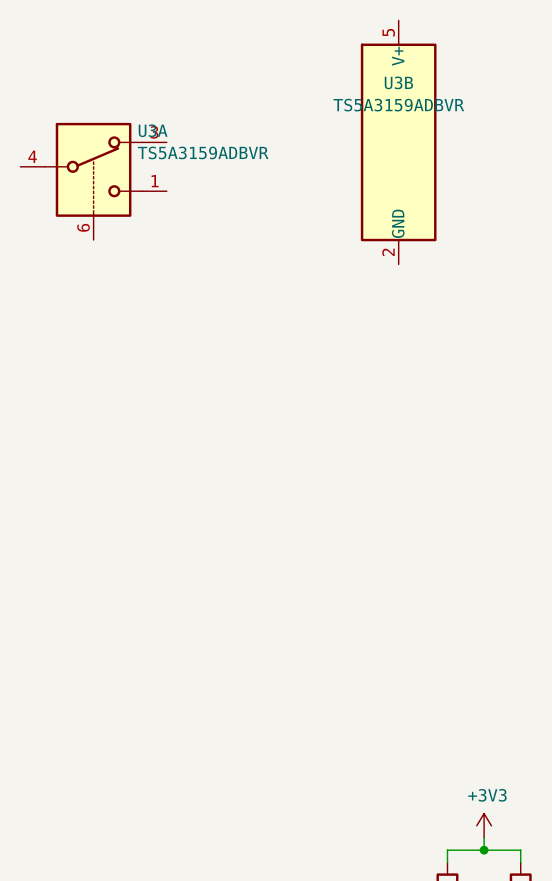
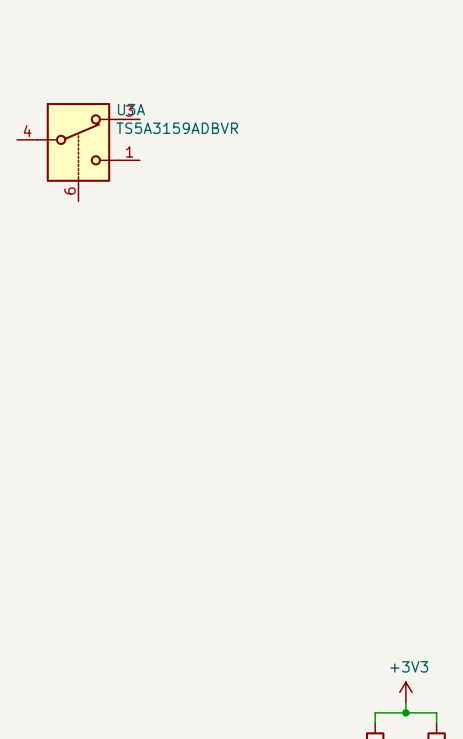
U3B: TS5A3159ADBVR (398, 142) -> none

